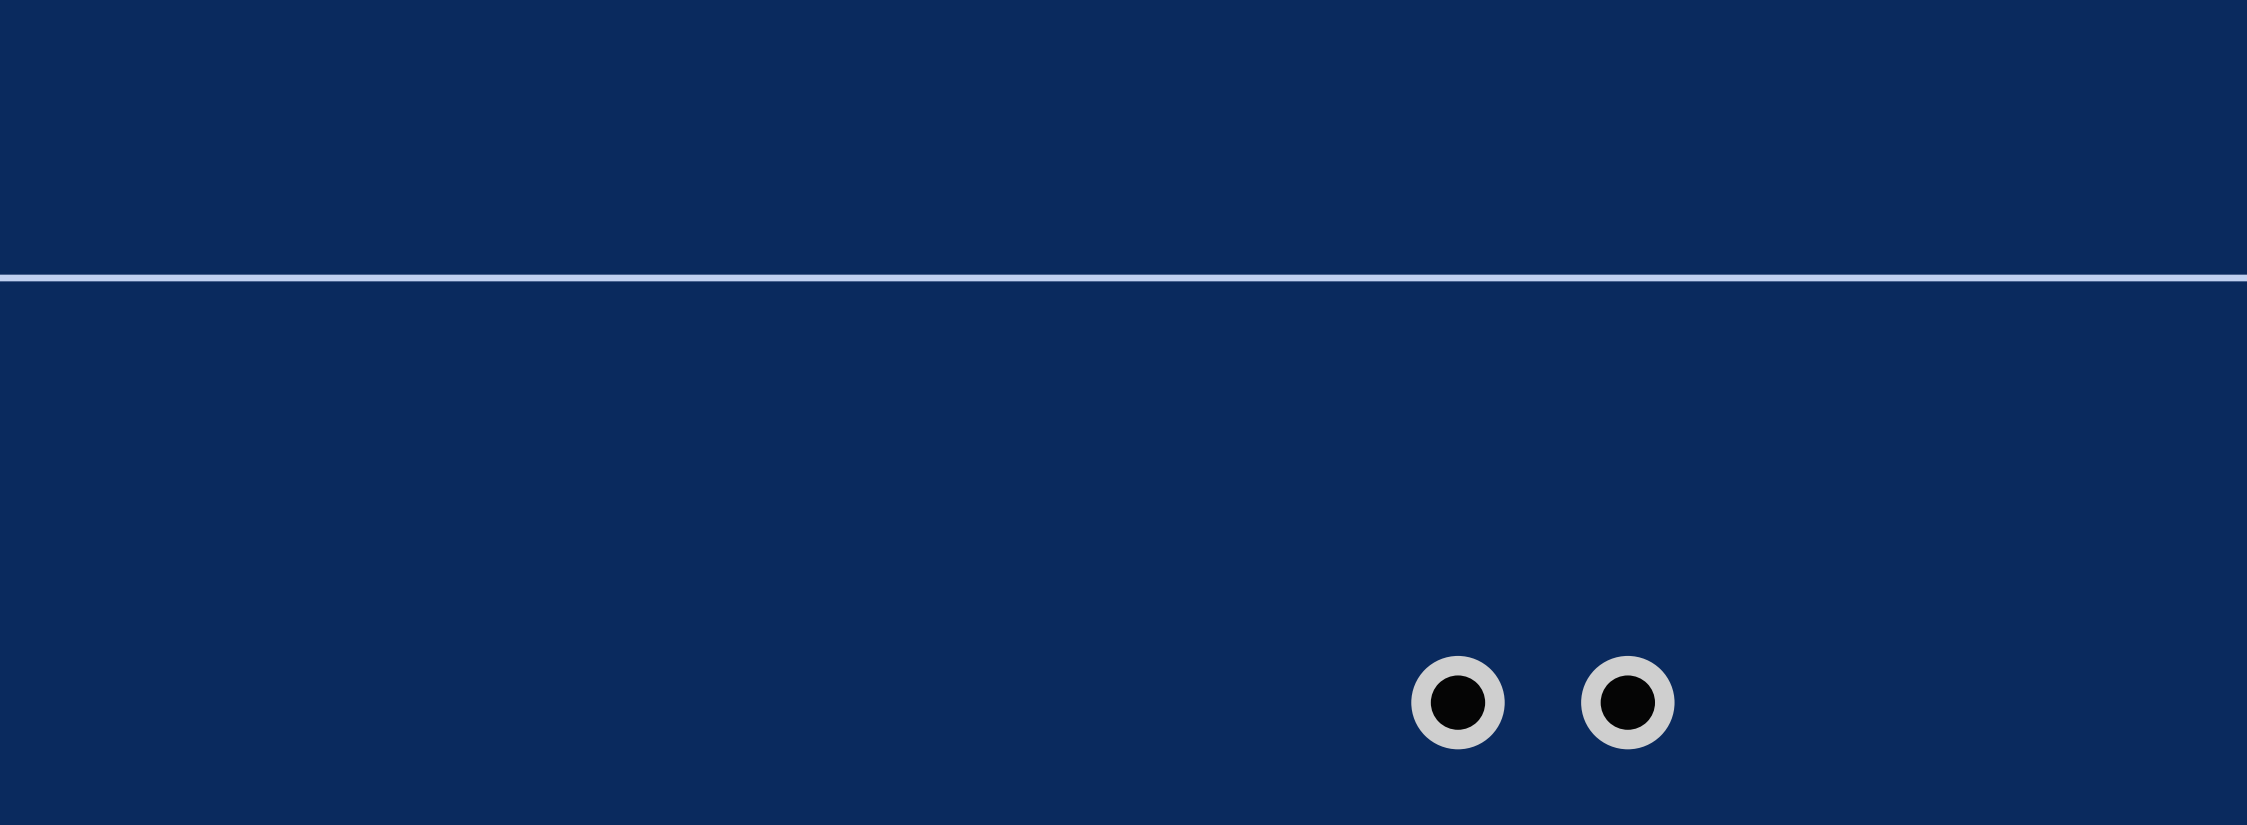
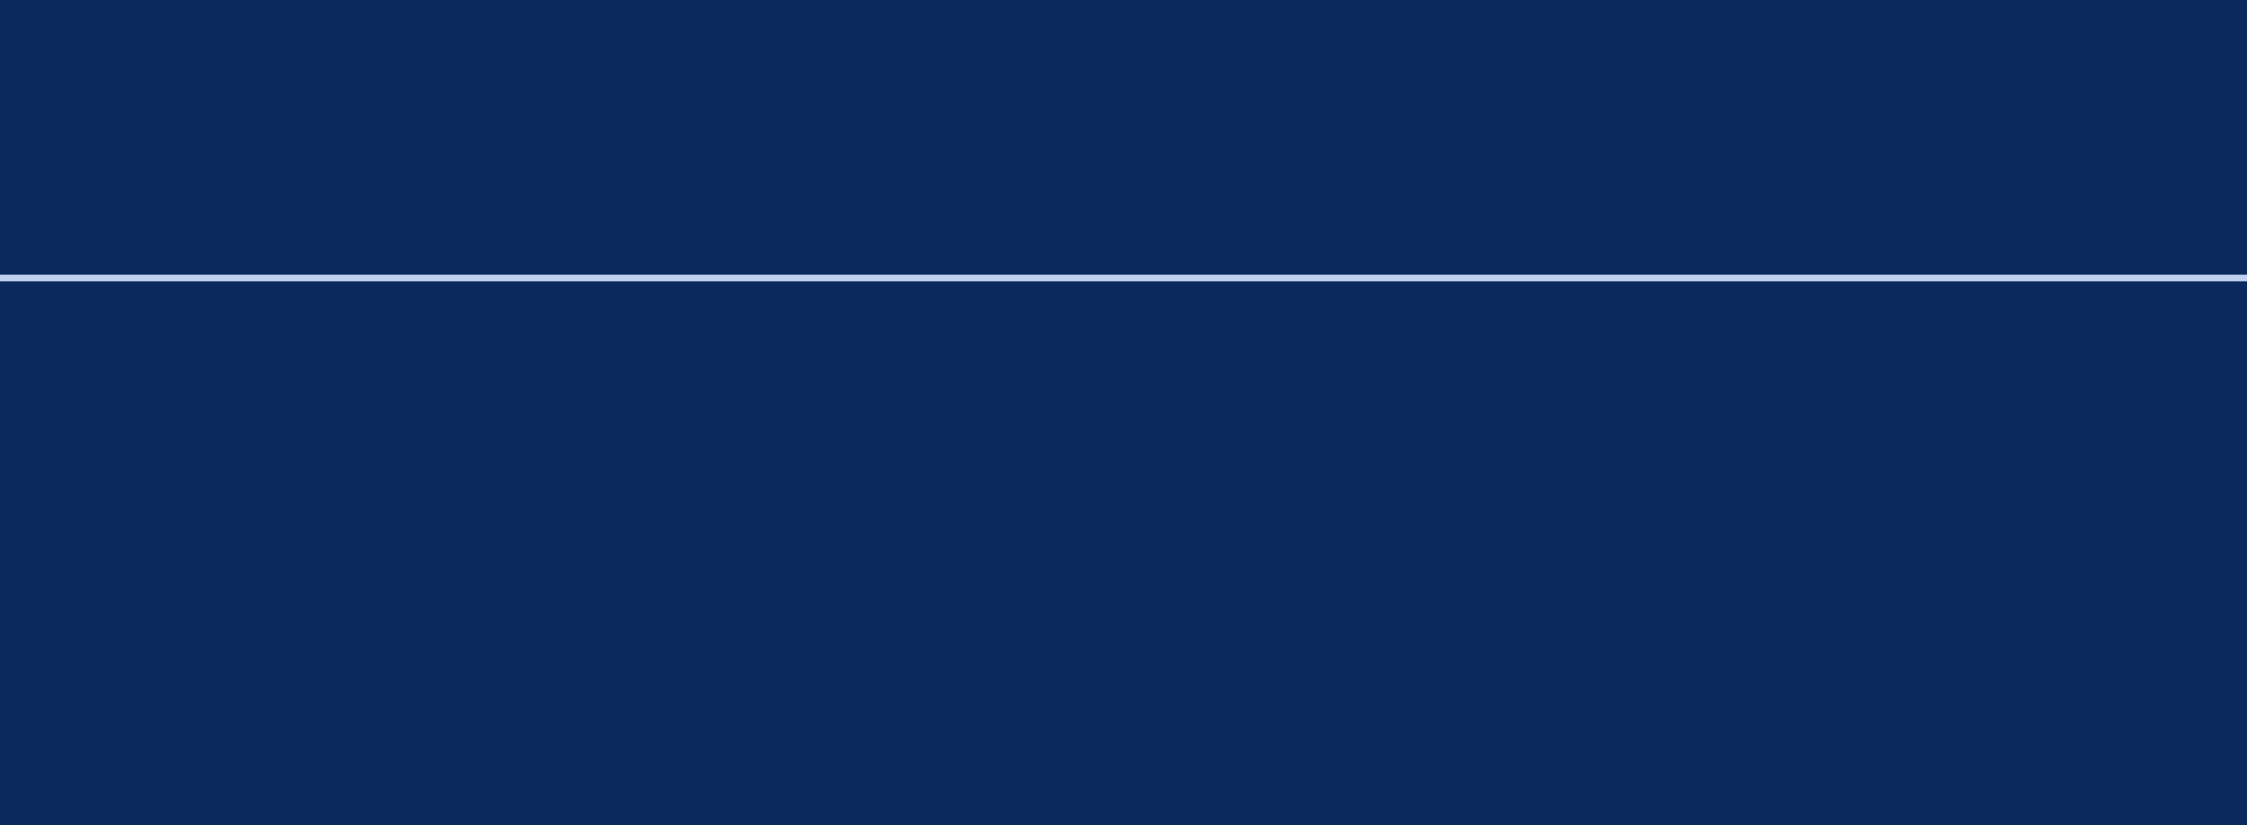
part: (1542, 702) -> none

